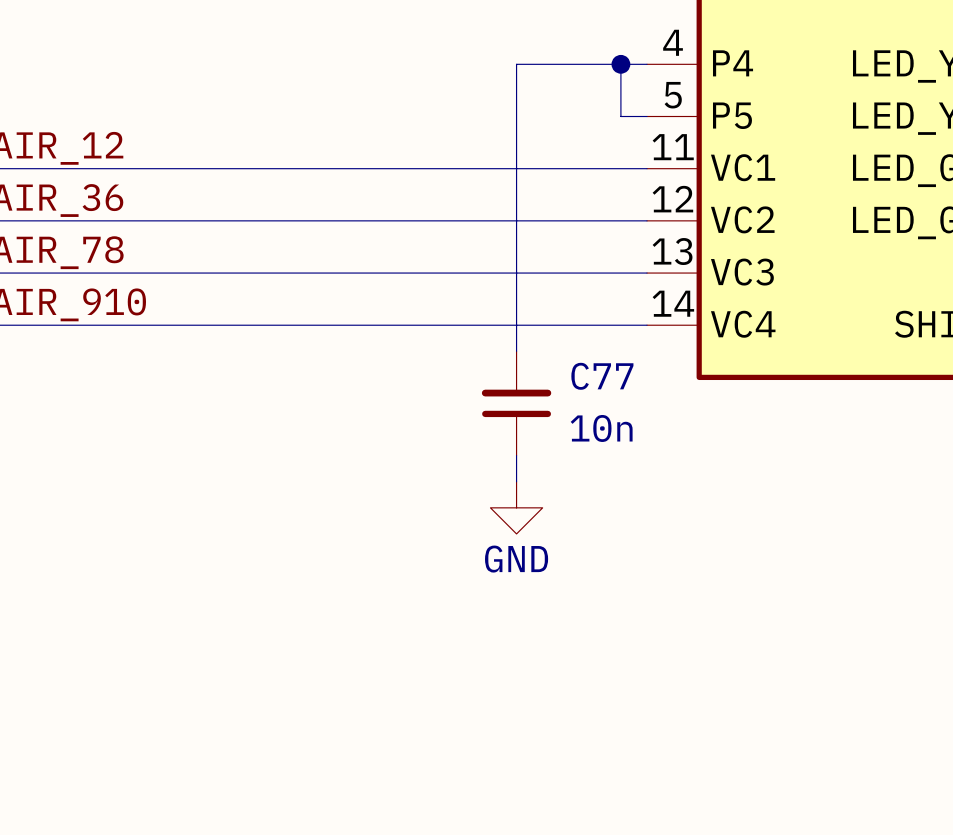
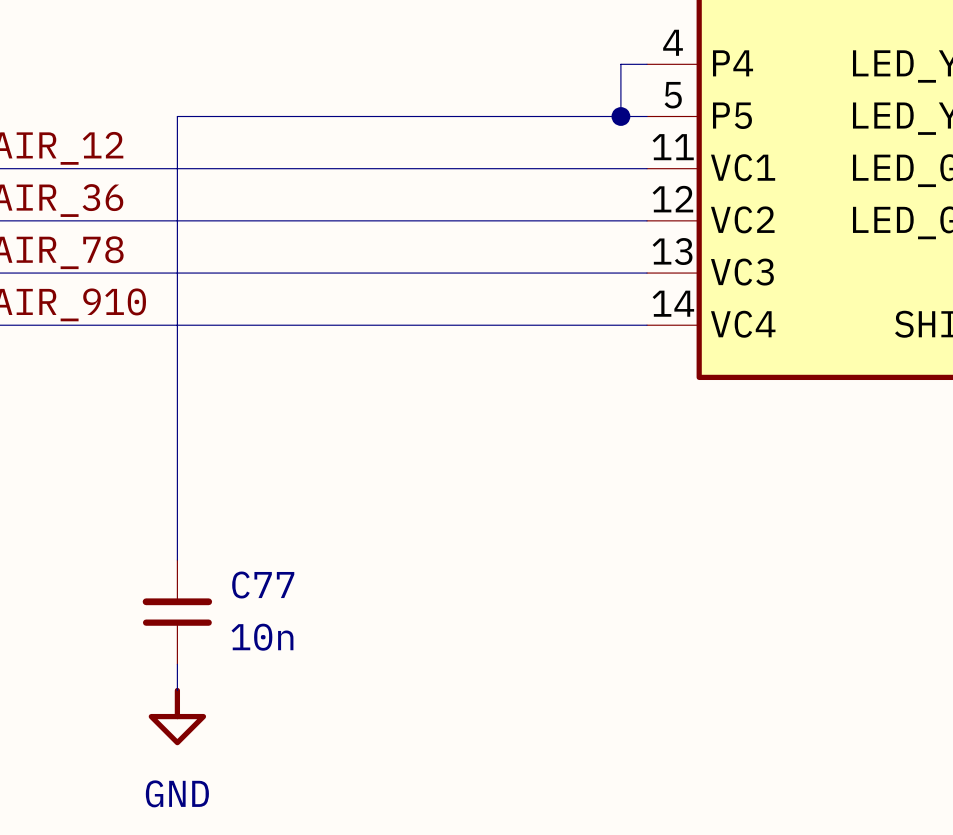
wire: (620, 64) (516, 64) (516, 351) -> none
junction position: (620, 64) -> (620, 116)
wire: none -> (620, 116) (177, 116) (177, 560)
C77 position: (516, 403) -> (177, 612)
wire: (516, 455) (516, 481) -> (177, 664) (177, 690)
power symbol: GND (516, 507) -> none
power symbol: none -> GND (177, 716)

